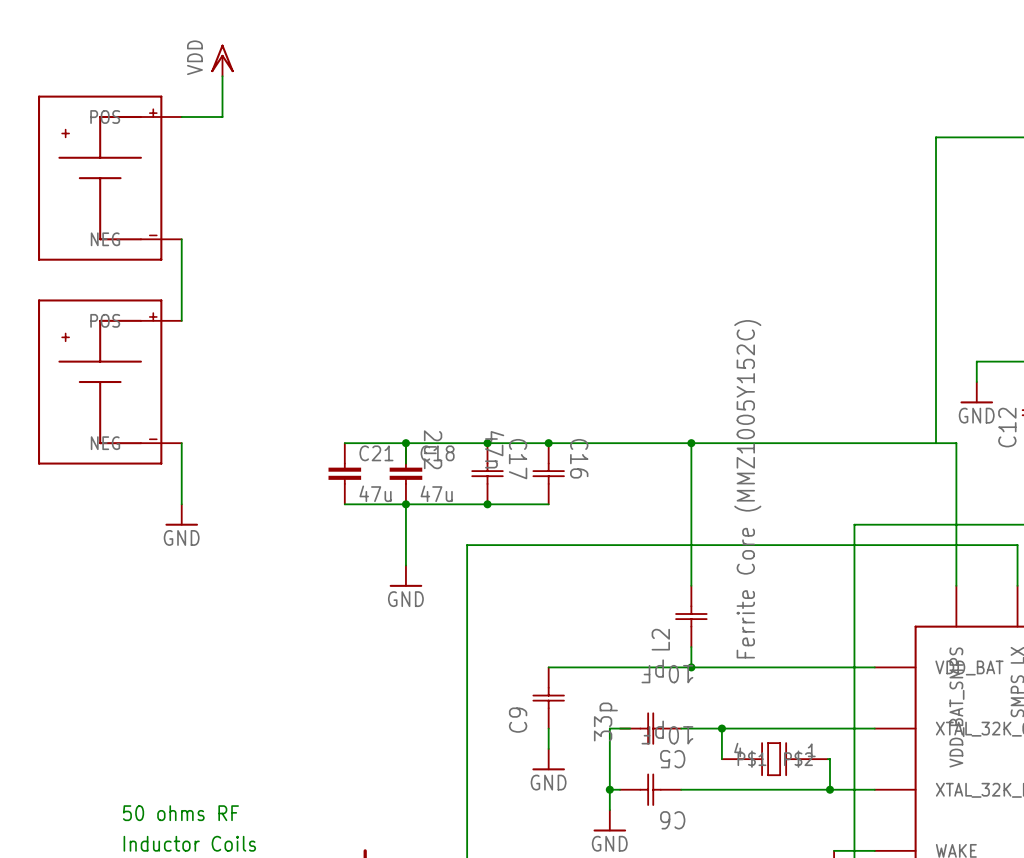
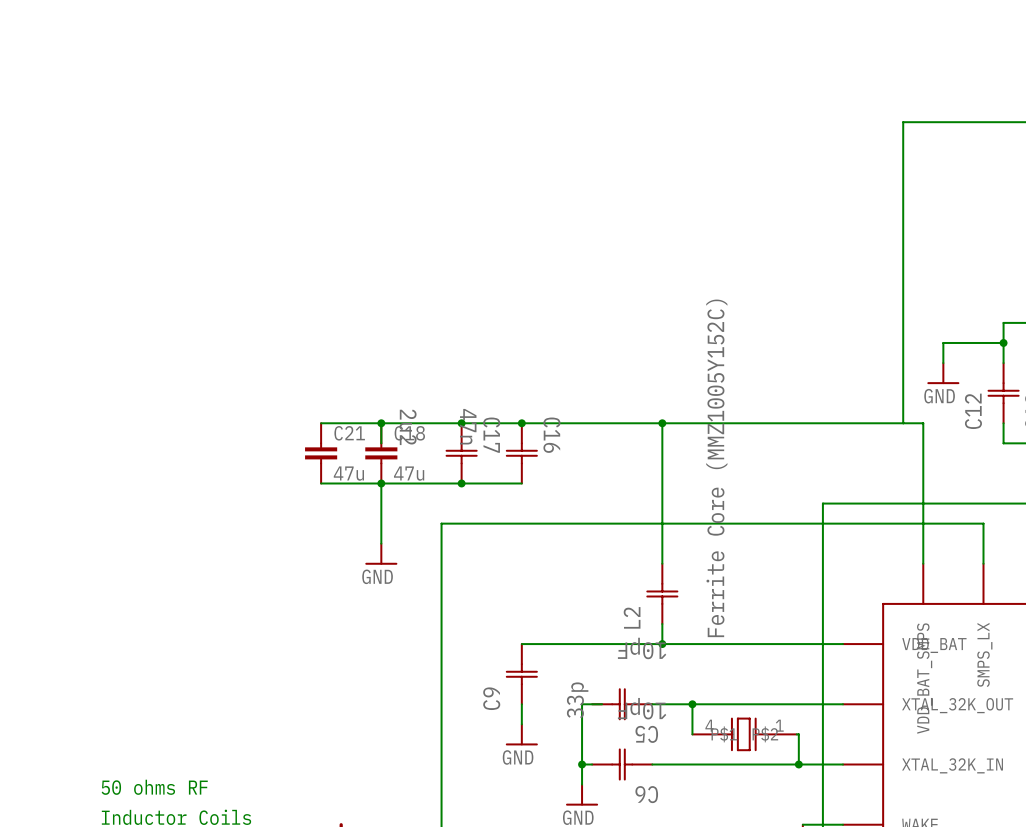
power symbol: VDD (222, 60) -> none
wire: (222, 76) (222, 117) (181, 117) -> none
part: (109, 178) -> none
wire: (181, 239) (181, 320) -> none
part: (109, 382) -> none
wire: (181, 443) (181, 504) -> none
power symbol: GND (181, 515) -> none

